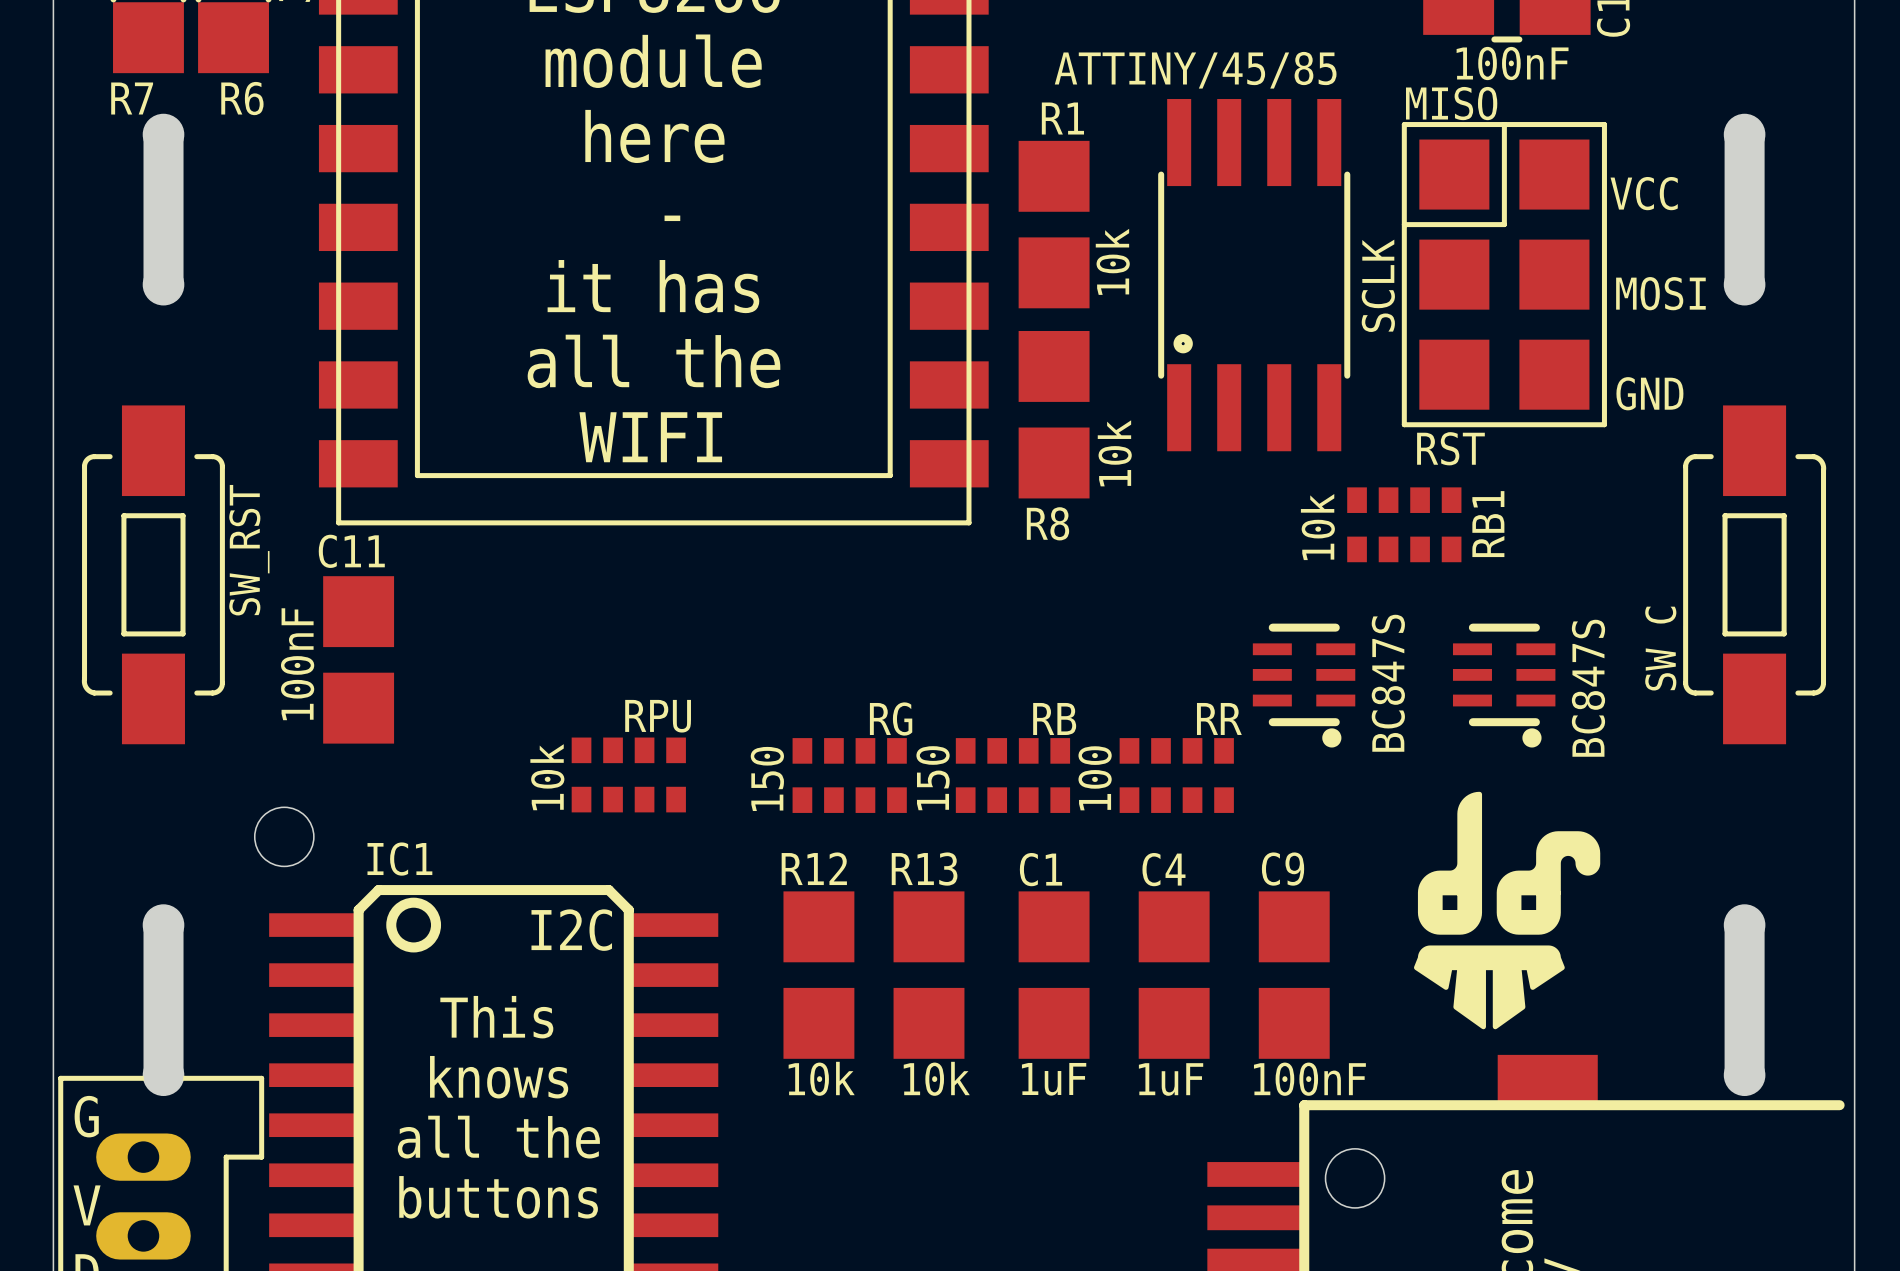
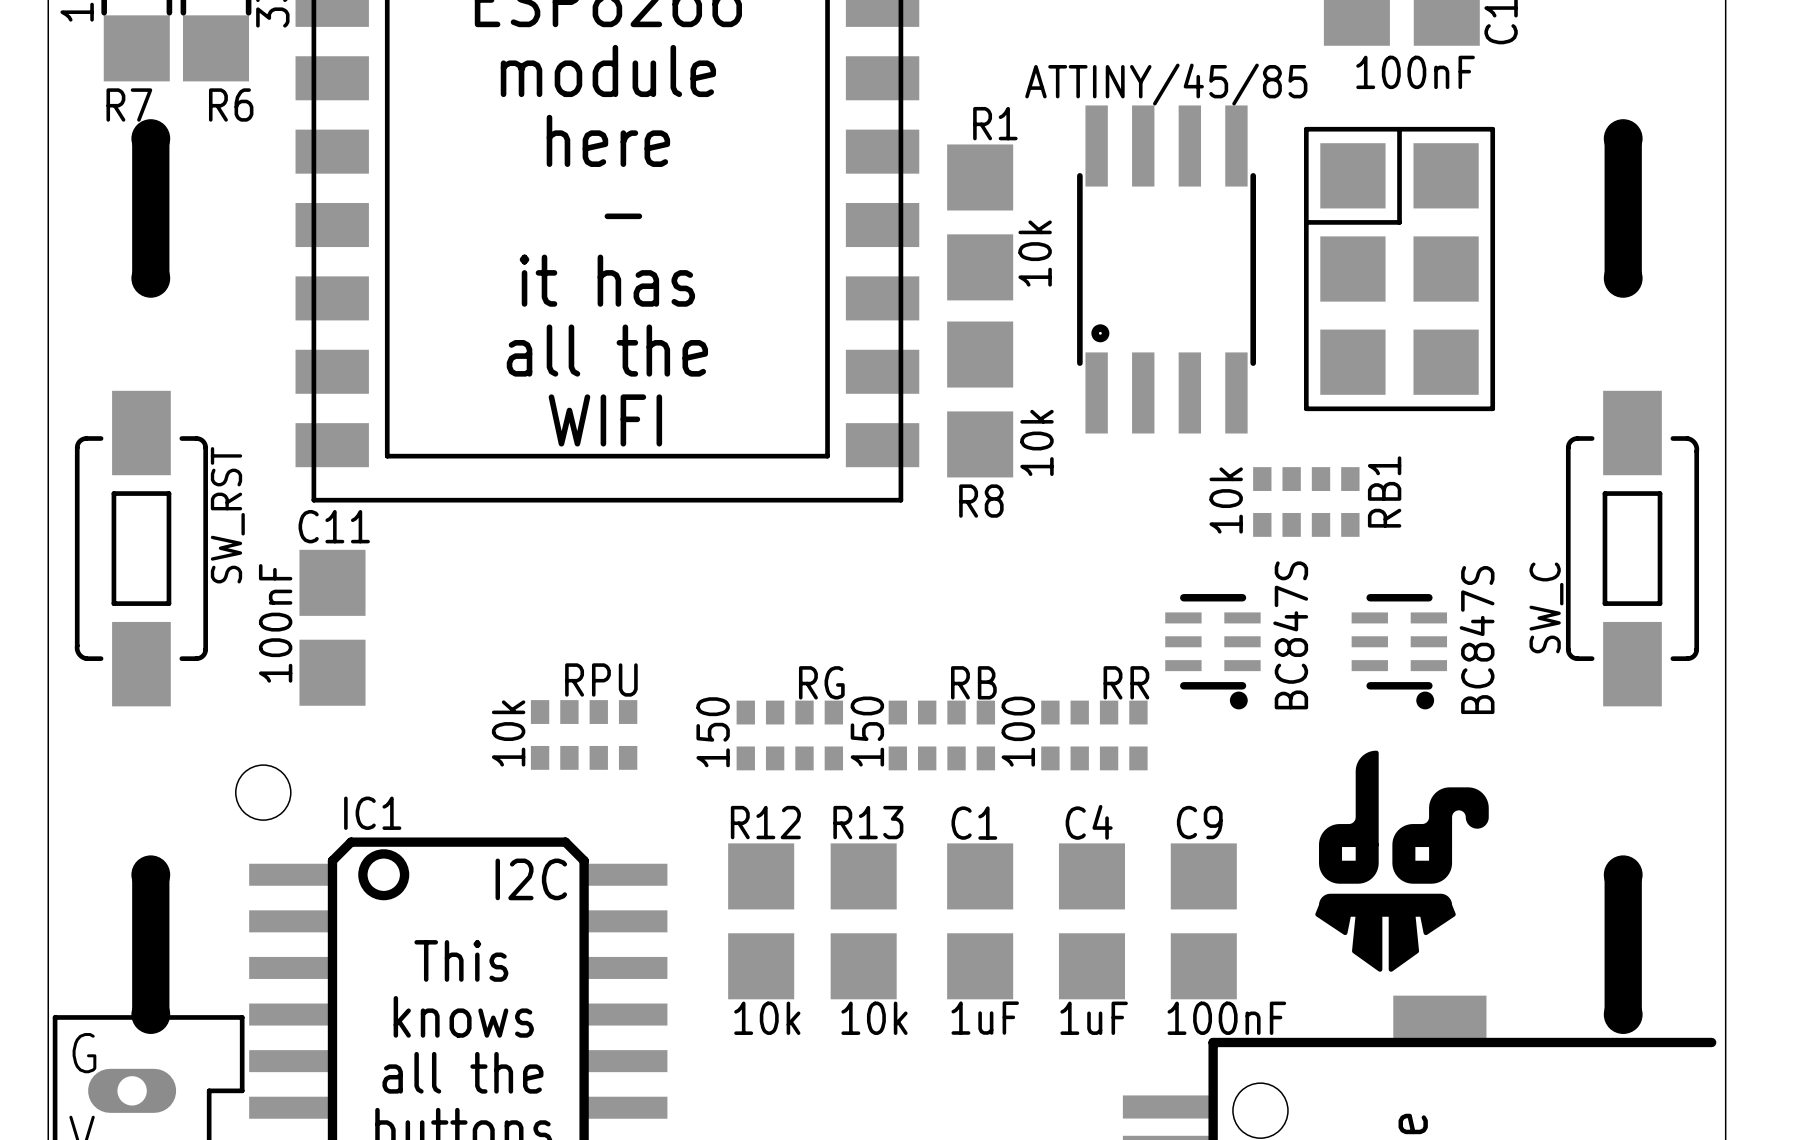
line: (1494, 39) (1519, 39) -> none
text position: ATTINY/45/85 (1195, 70) -> ATTINY/45/85 (1166, 84)
text: MISO (1451, 103) -> none
text: VCC (1644, 193) -> none
text: SCLK (1378, 285) -> none
text: MOSI (1660, 293) -> none
text: GND (1649, 393) -> none
text: RST (1450, 448) -> none

